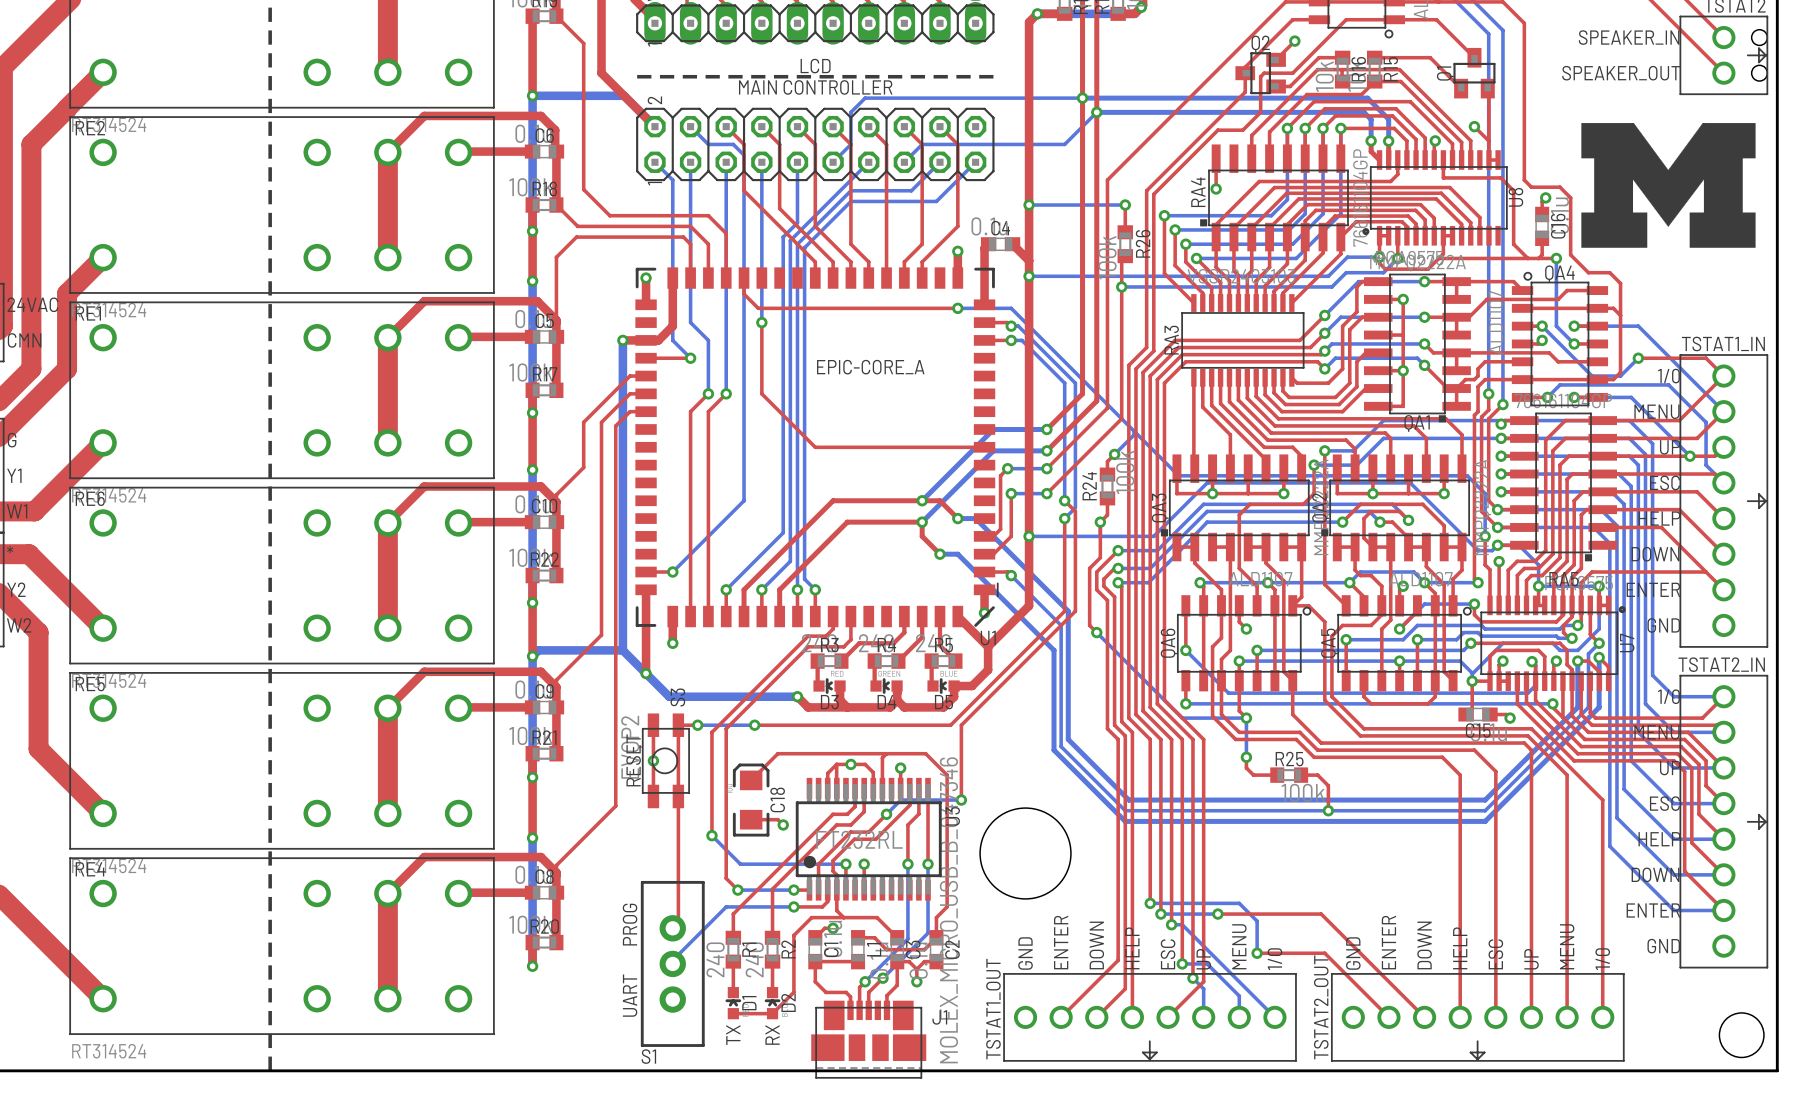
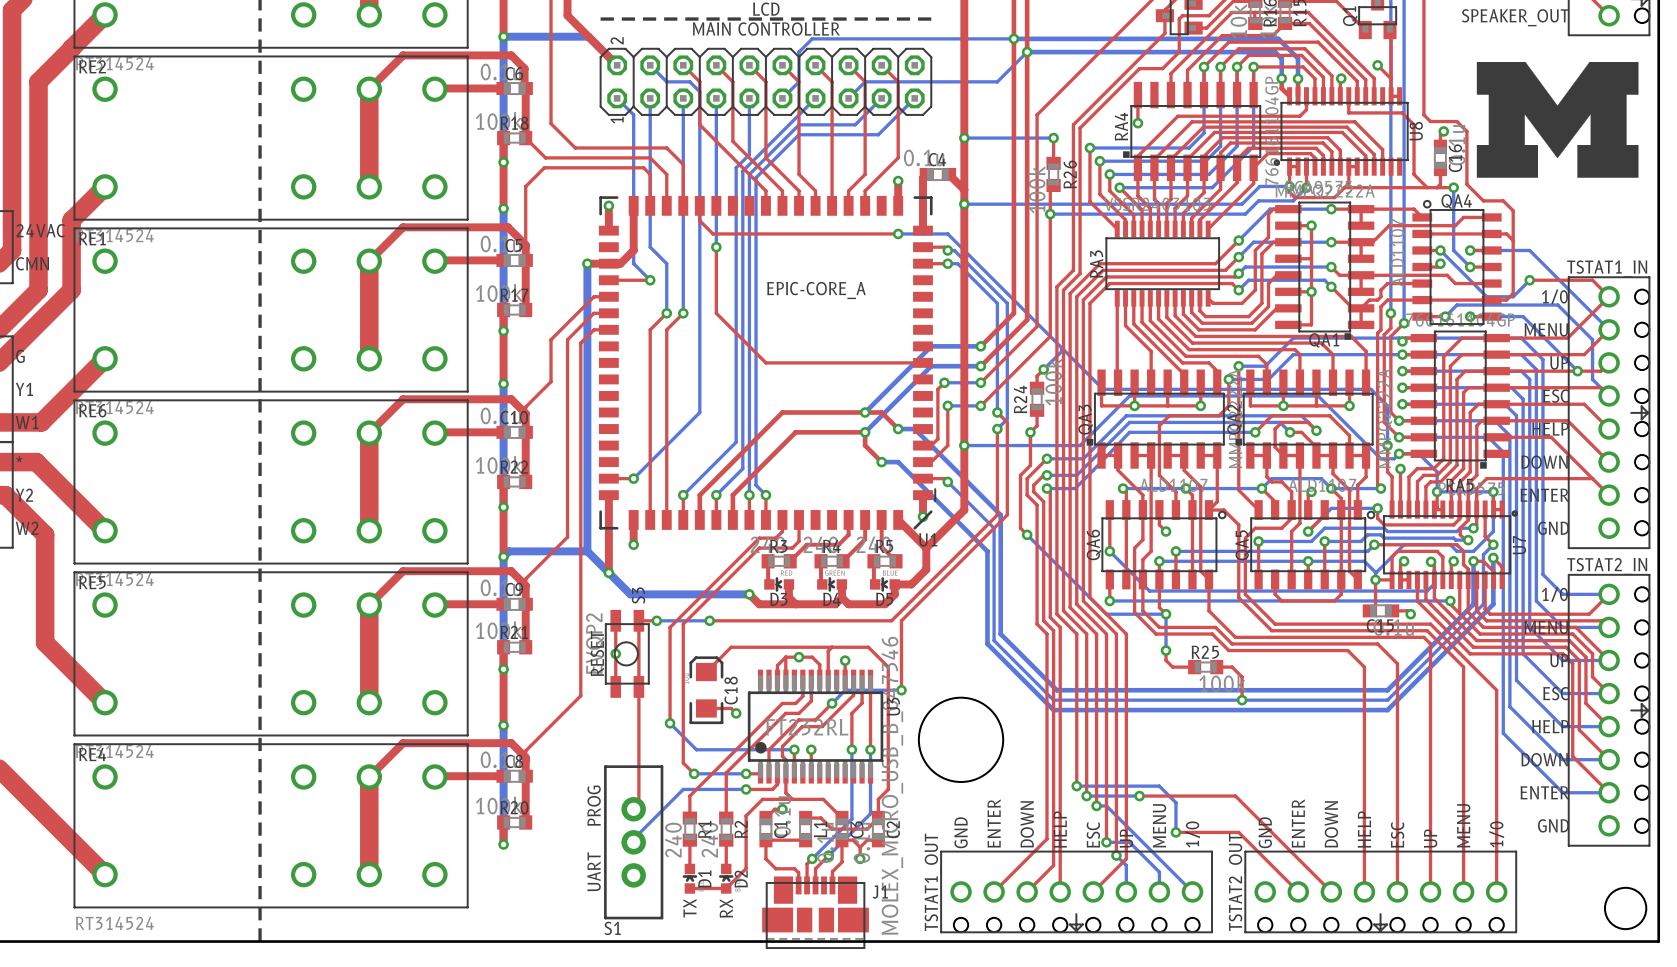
part footprint: [1679, 354, 1769, 648] -> [1567, 276, 1651, 549]
part footprint: [1679, 674, 1769, 969] -> [1567, 574, 1651, 847]
part footprint: [1003, 973, 1297, 1062] -> [940, 850, 1213, 934]
part footprint: [1330, 973, 1625, 1062] -> [1244, 850, 1518, 934]

